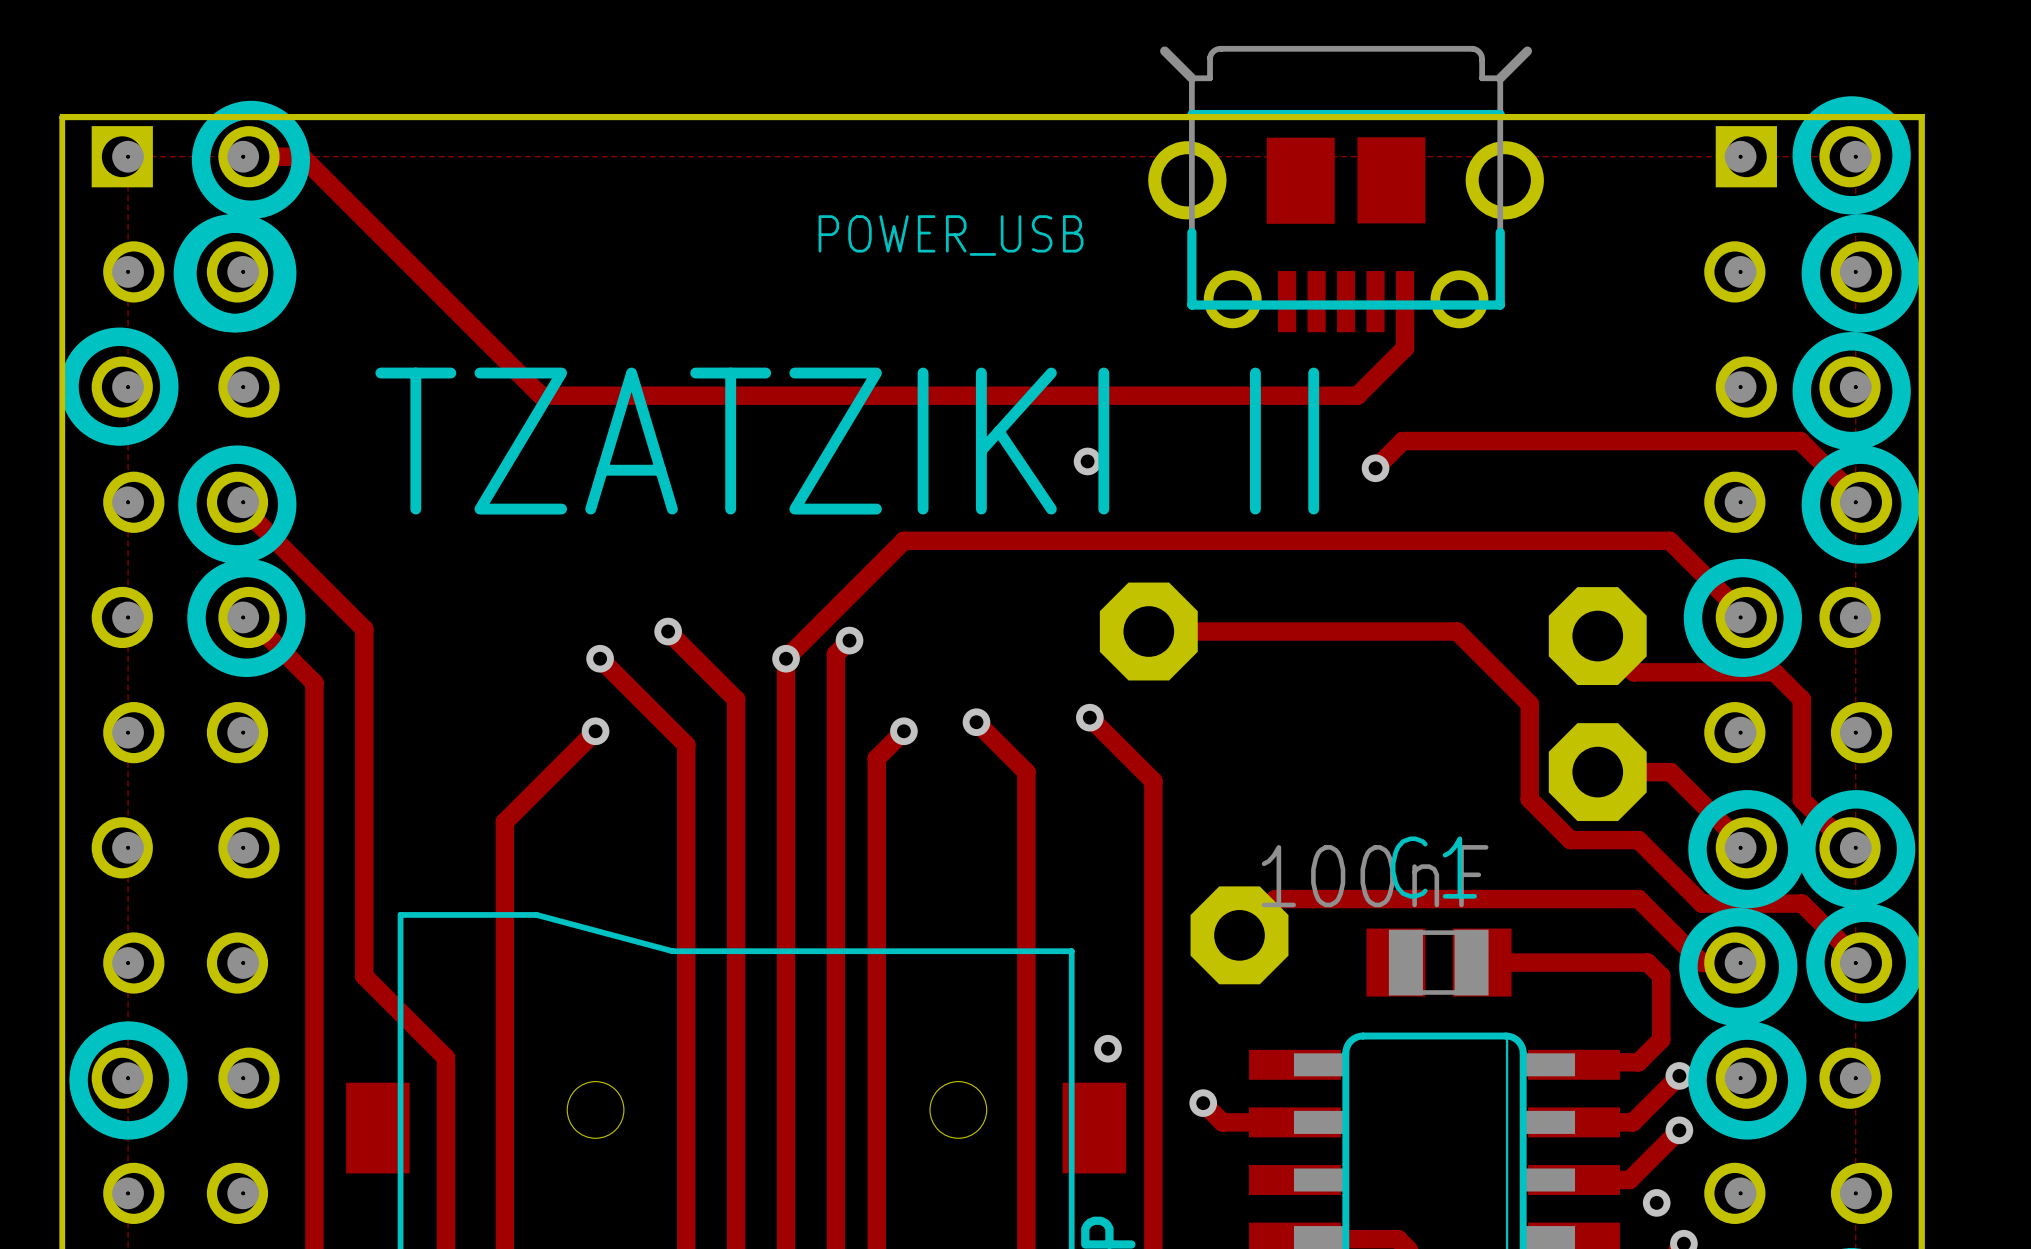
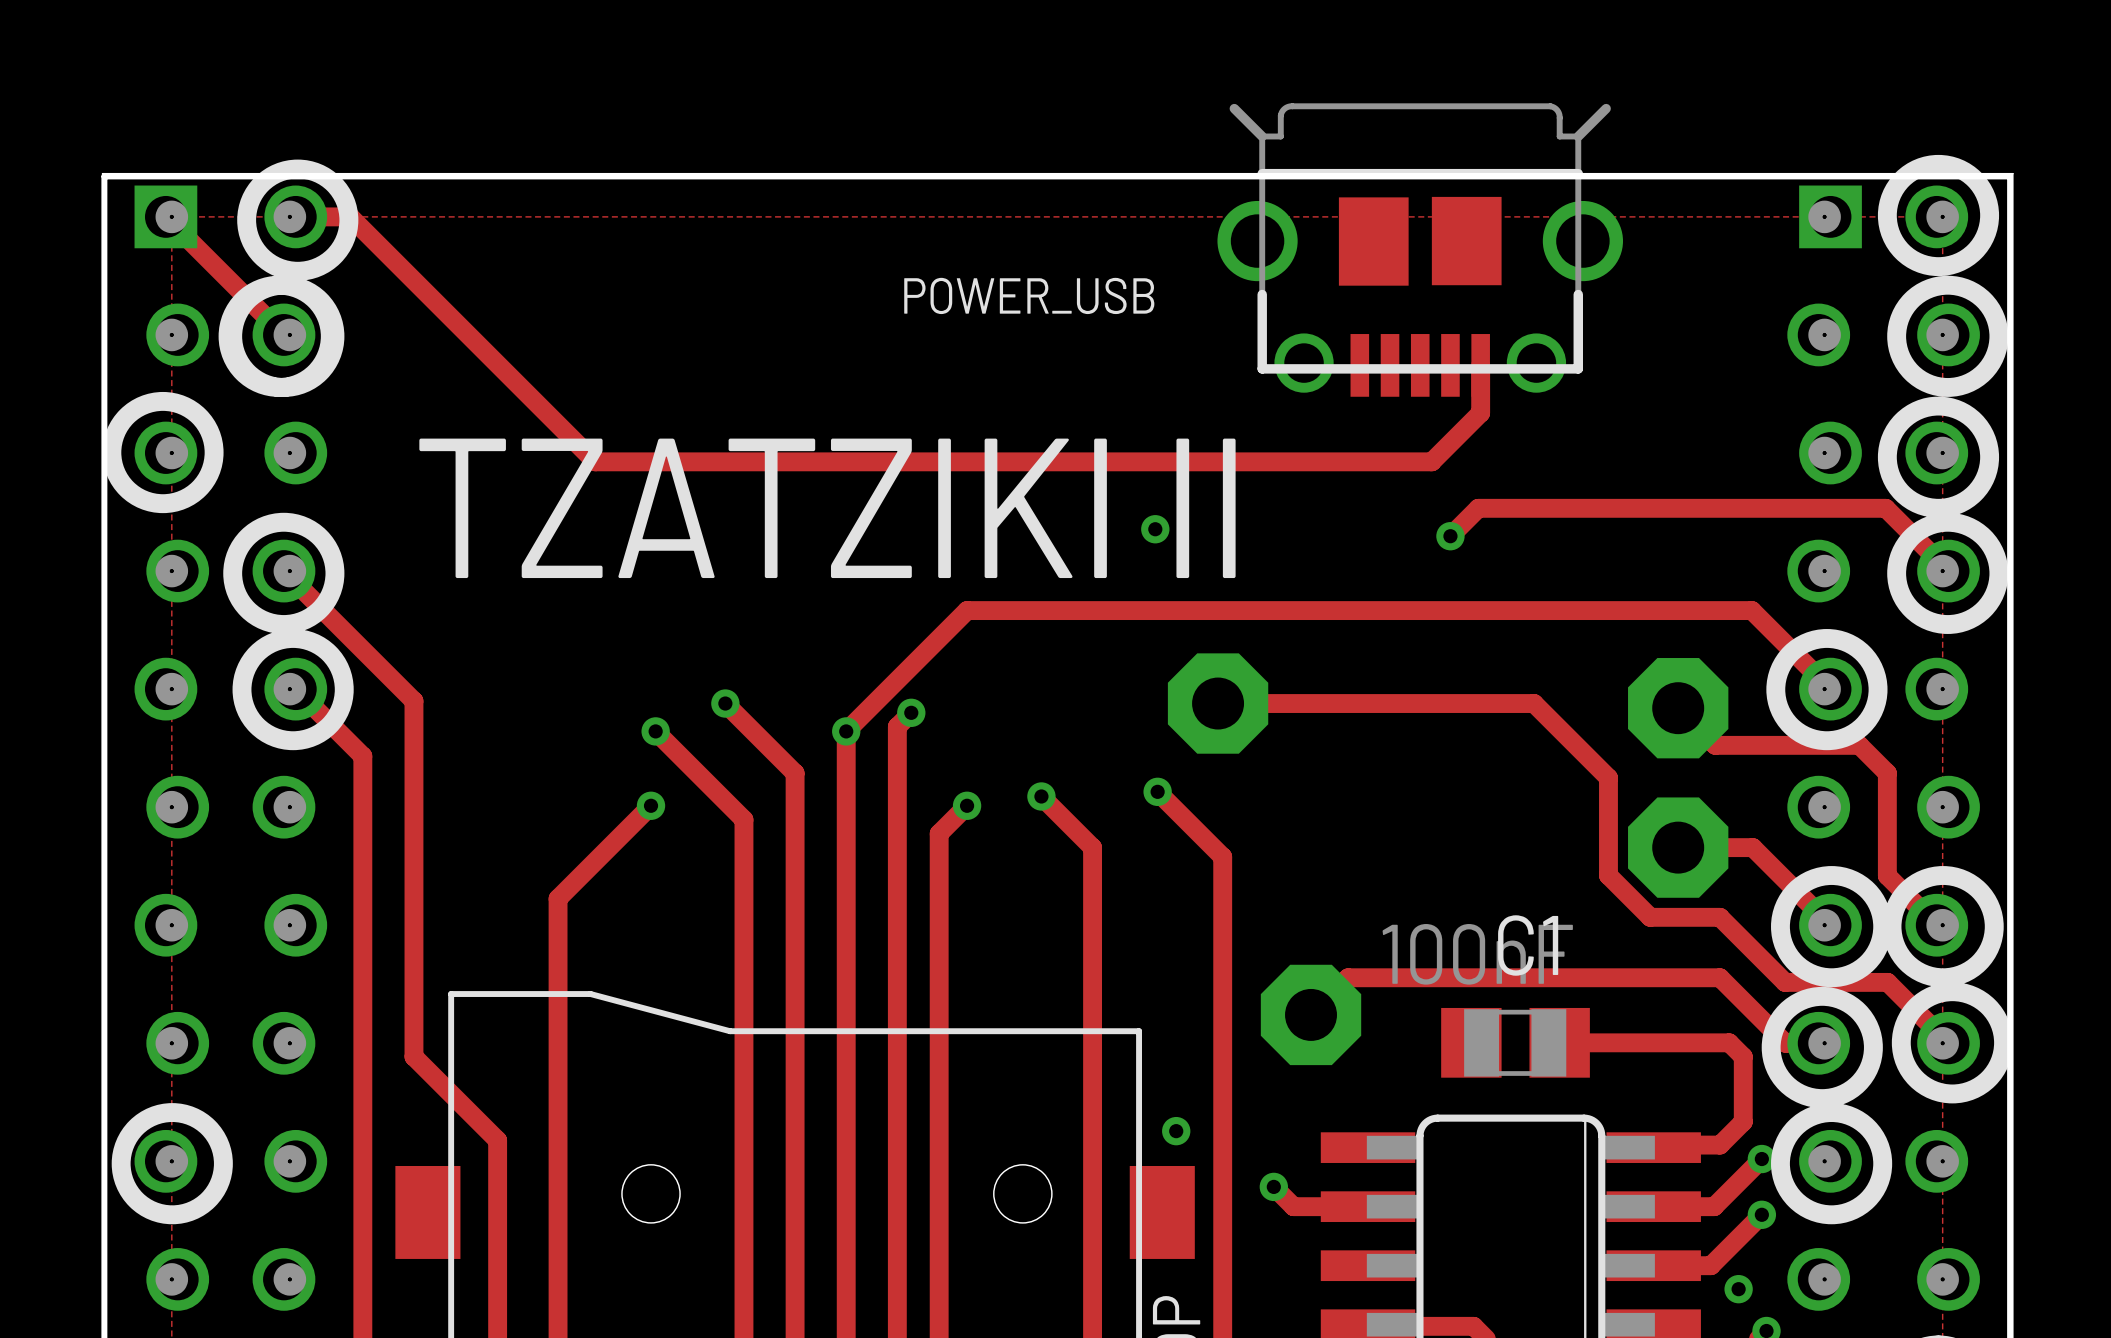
track: none -> (165, 216) (283, 334)

